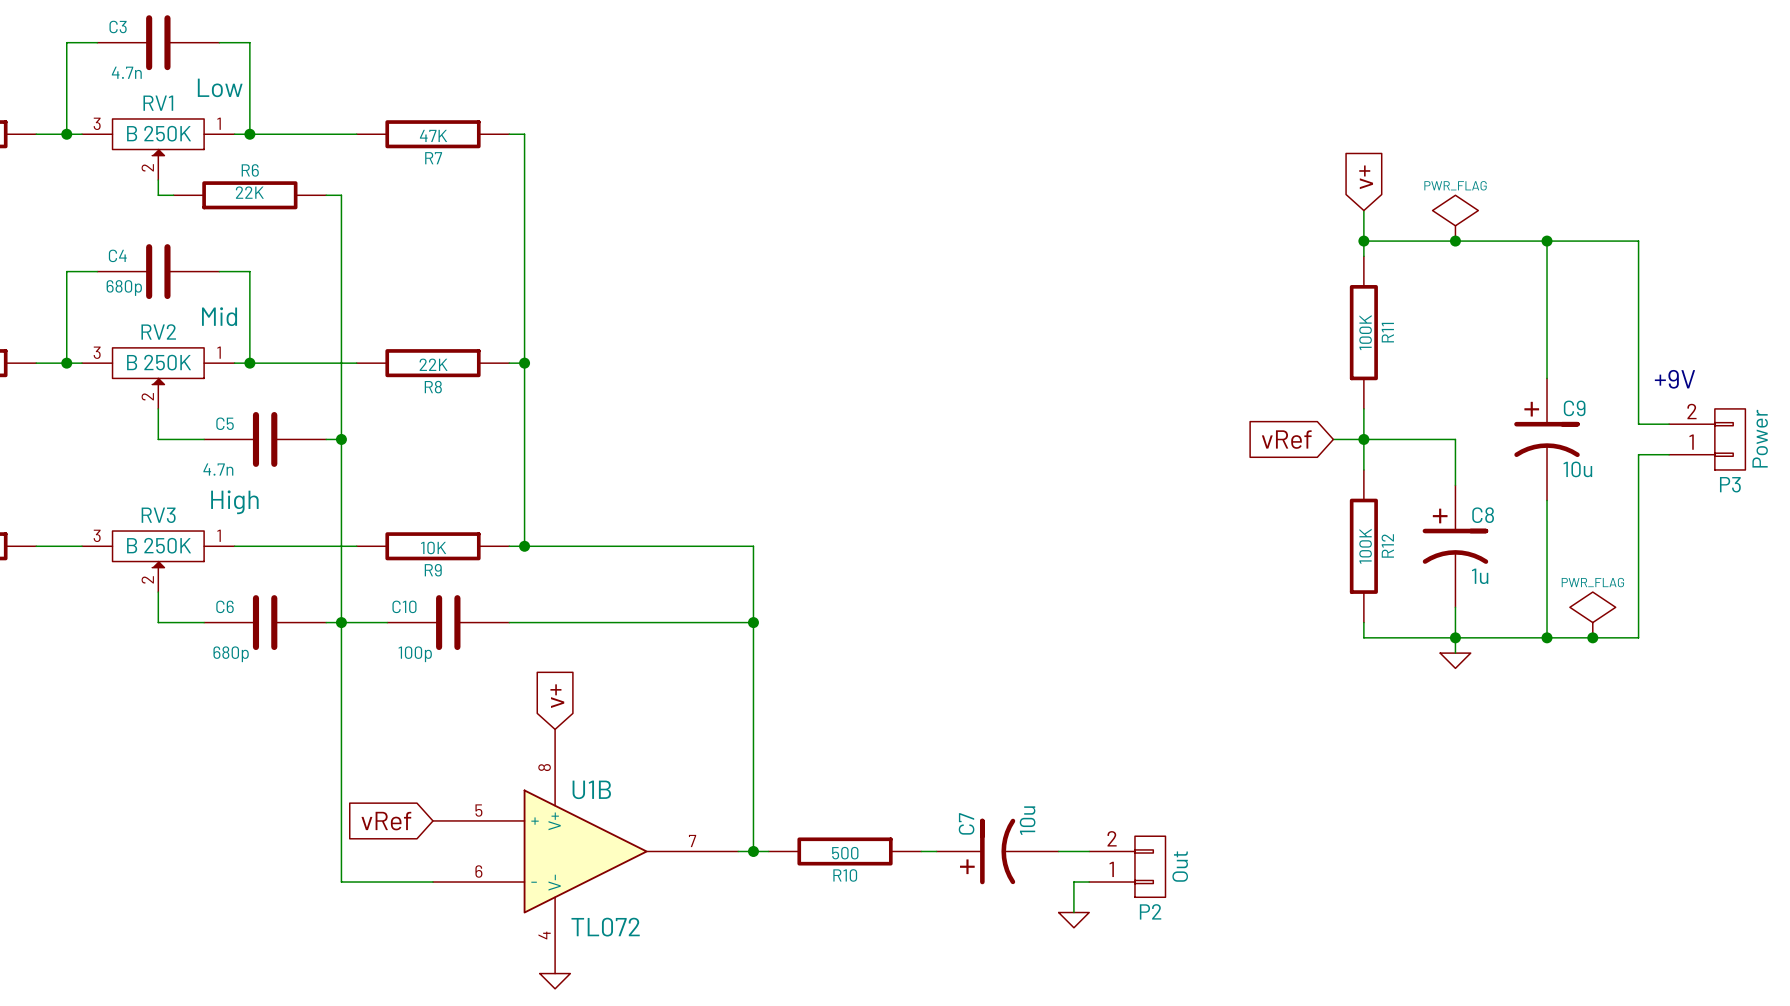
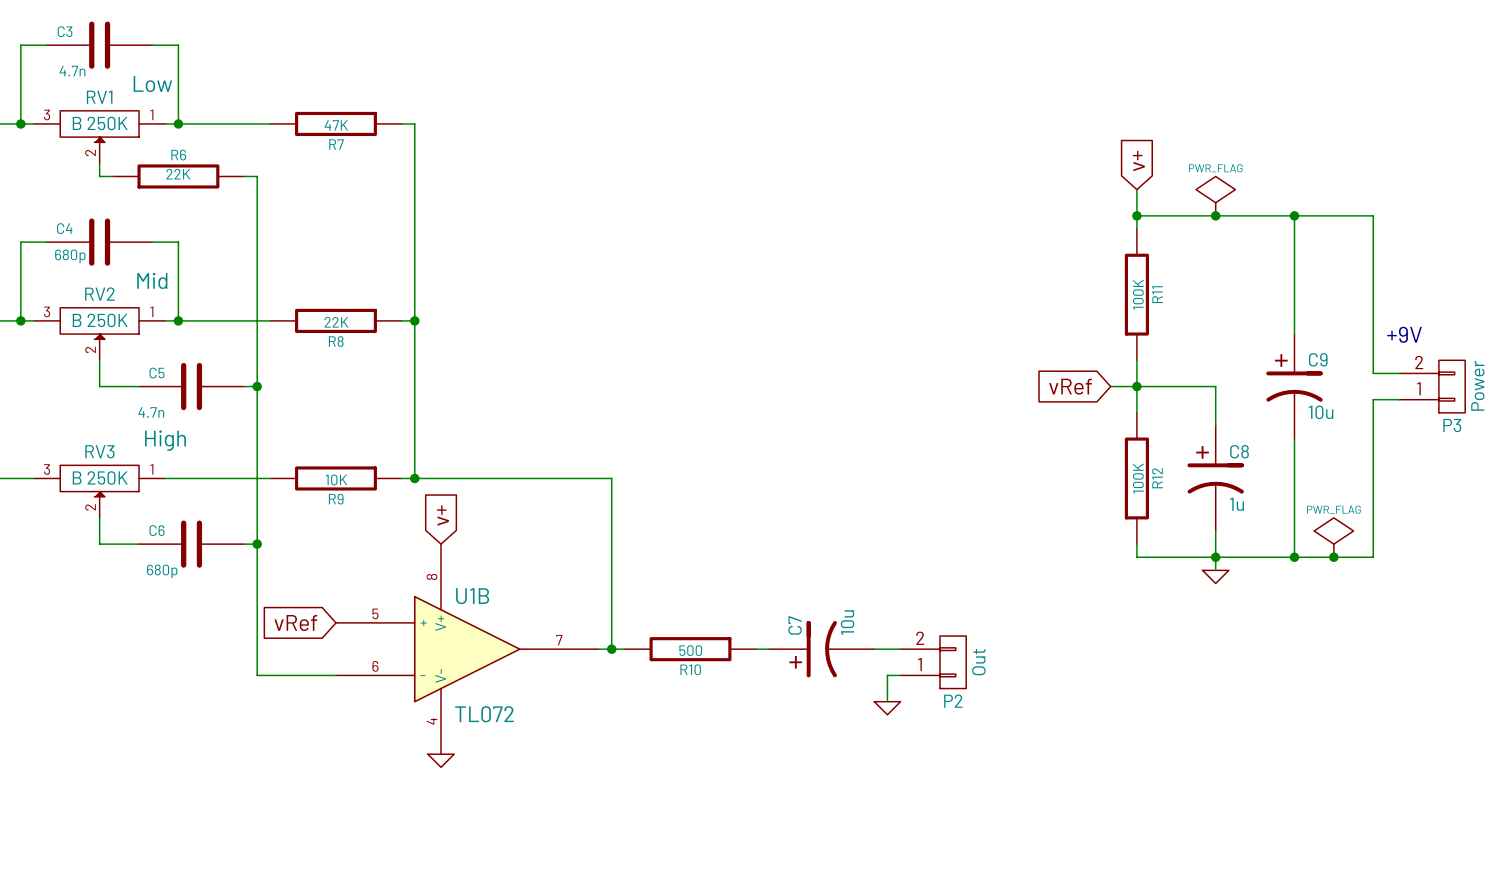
wire: (341, 622) (387, 622) -> none
C10: 100p (448, 622) -> none
wire: (509, 622) (753, 622) -> none
junction: (753, 622) -> none
global label position: v+ (557, 696) -> v+ (442, 515)
wire: (753, 744) (753, 851) -> none
junction: none -> (611, 649)
wire: (341, 775) (341, 882) (433, 882) -> (257, 675) (335, 675)
global label position: vRef (386, 821) -> vRef (295, 623)
U1B position: (585, 851) -> (467, 649)
wire: (738, 851) (768, 851) -> (598, 649) (624, 649)
junction: (753, 851) -> none
R10 position: (845, 851) -> (690, 649)
wire: (921, 851) (936, 851) -> (756, 649) (769, 649)
C7 position: (997, 851) -> (821, 649)
wire: (1058, 851) (1089, 851) -> (874, 649) (900, 649)
P2 position: (1127, 866) -> (933, 662)
wire: (1089, 882) (1073, 882) (1073, 912) -> (900, 675) (887, 675) (887, 701)
power symbol position: (1073, 920) -> (887, 708)
power symbol position: (555, 981) -> (441, 760)

